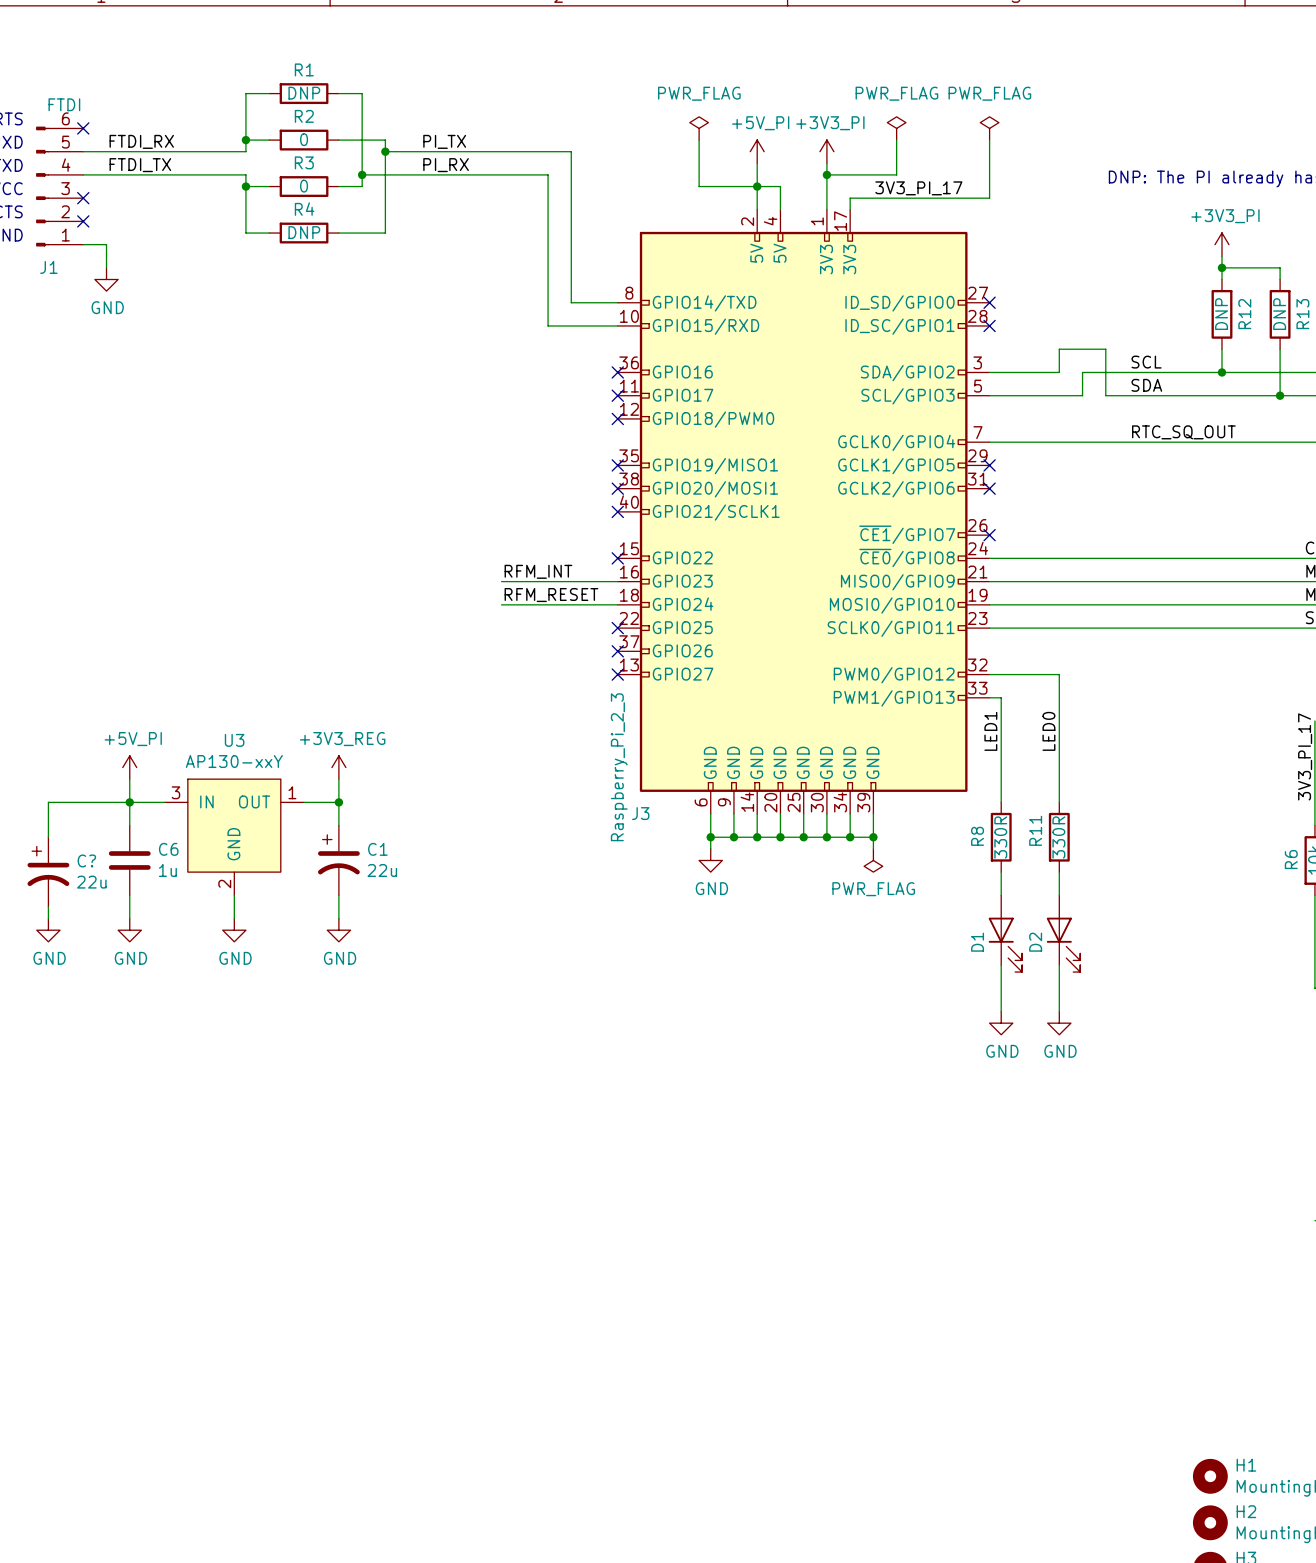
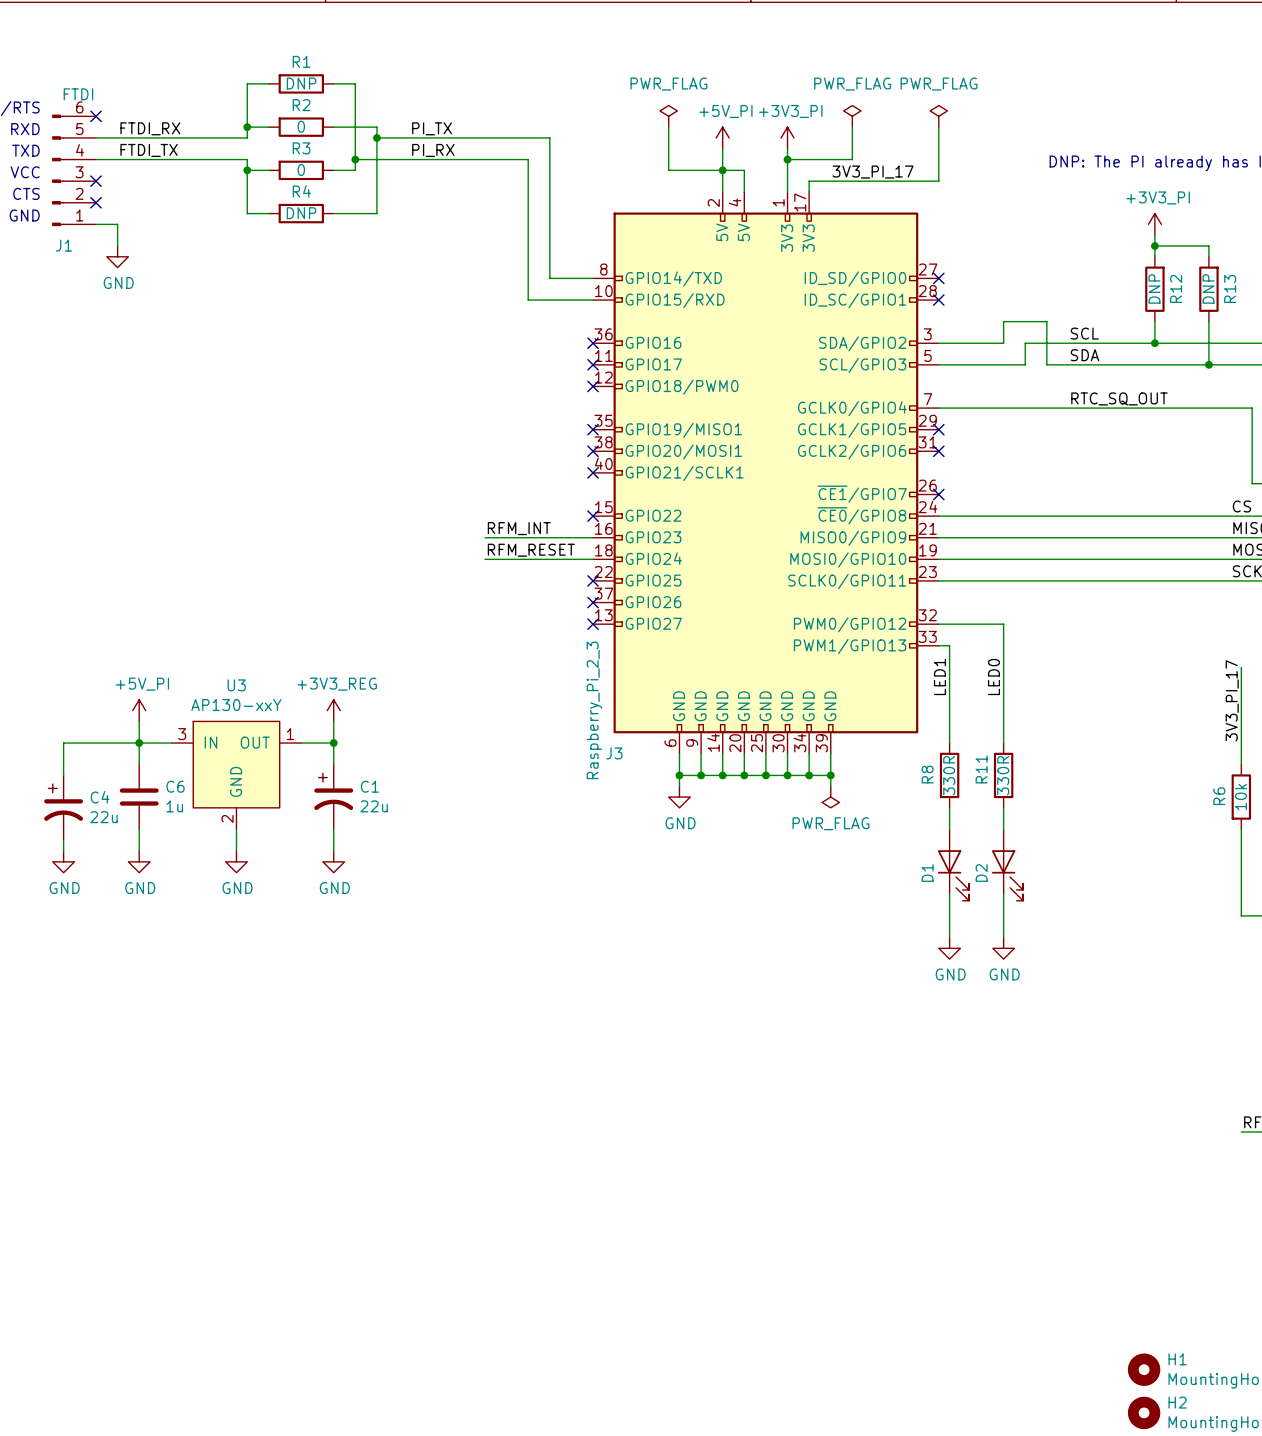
C? name: C? (86, 860) -> C4 (100, 797)

